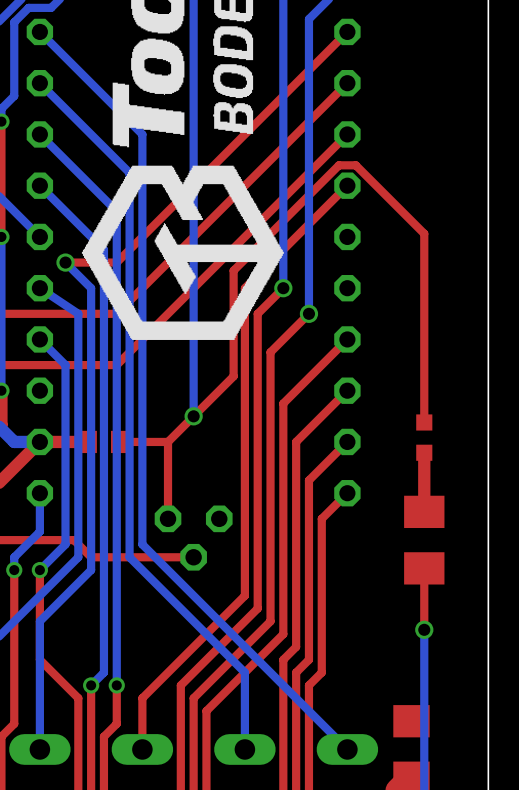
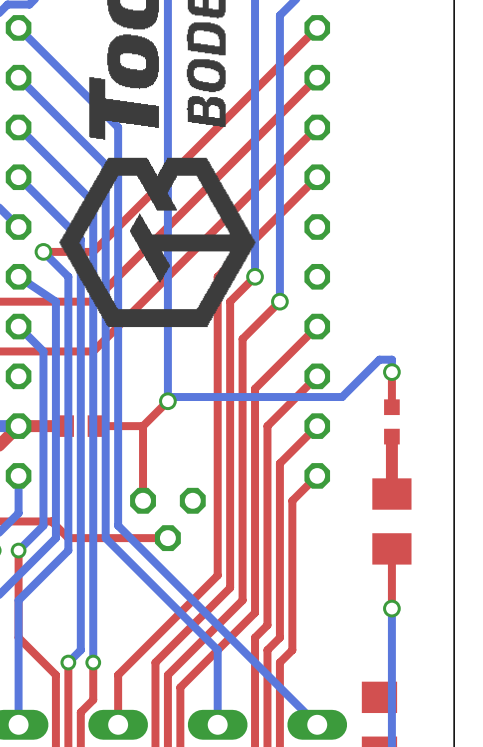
bottom track: none -> (391, 372) (391, 359) (379, 359) (342, 397) (172, 397) (167, 401)
top track: (424, 386) (424, 233) (355, 165) (338, 165) (233, 270) (233, 376) (193, 416) -> none
via: none -> (391, 372)

